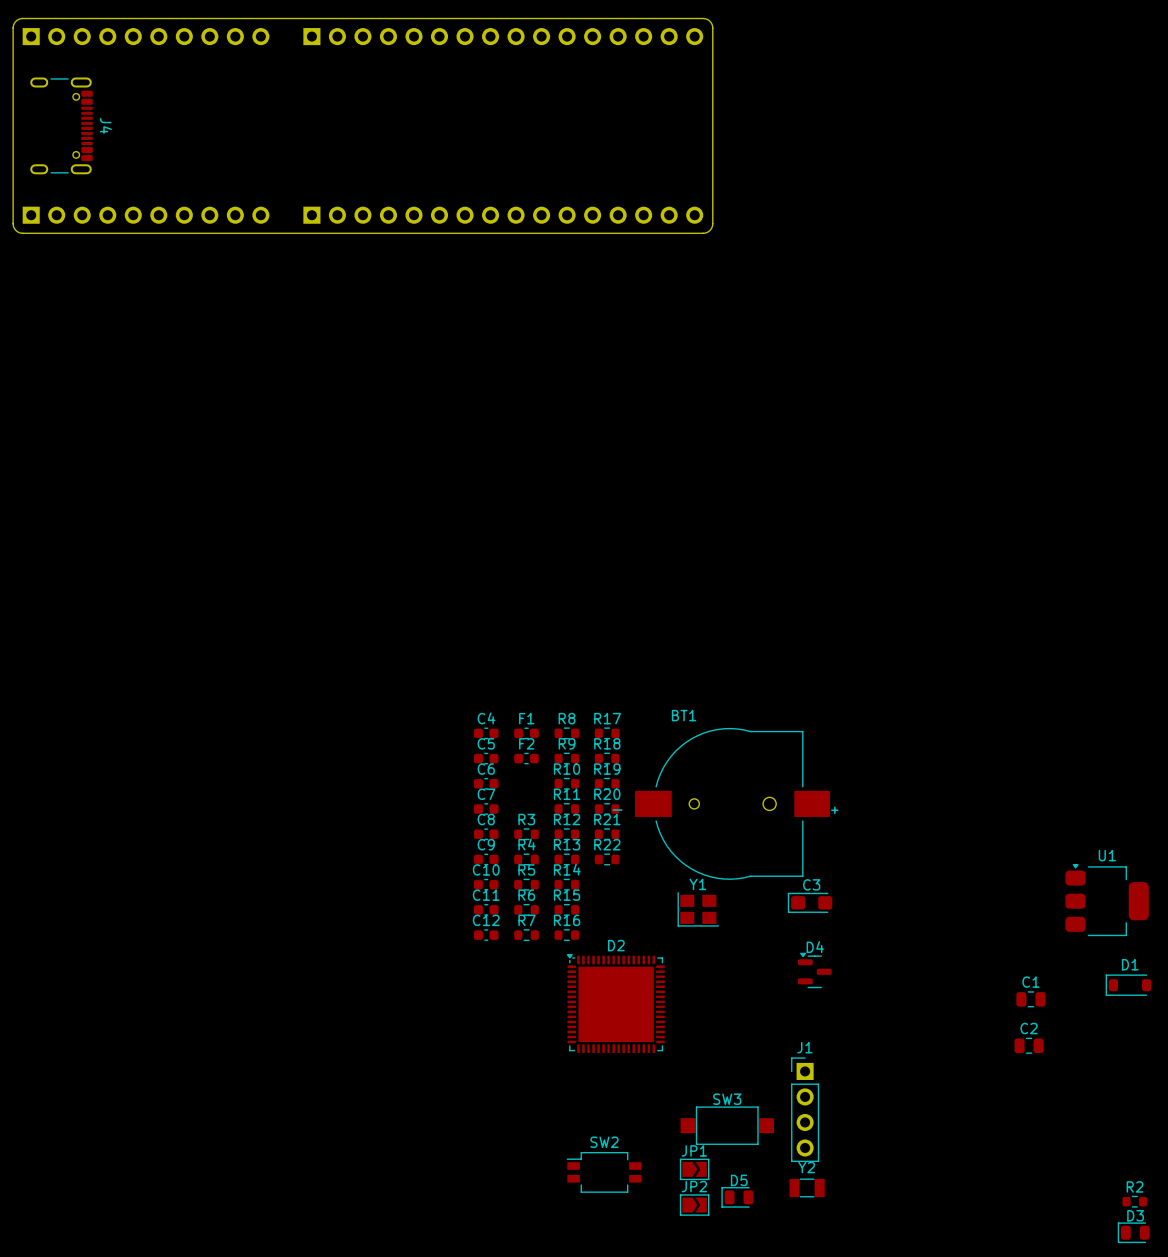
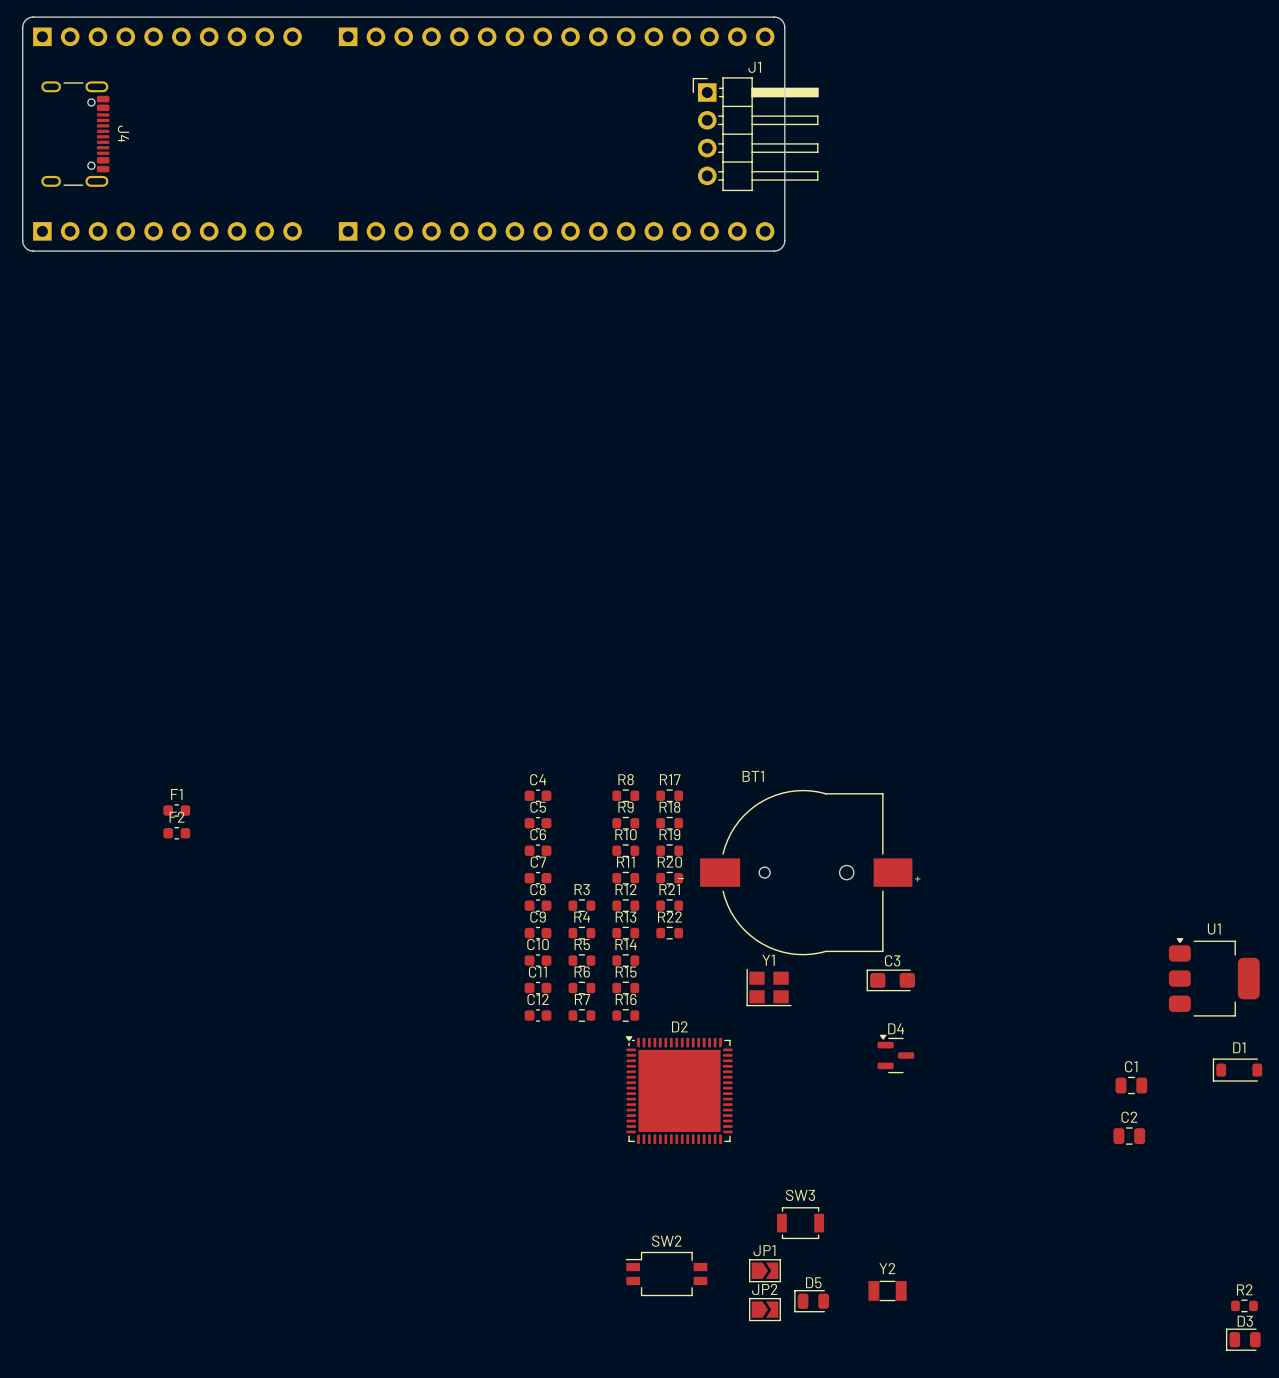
F1 position: (526, 733) -> (176, 810)
F2 position: (526, 758) -> (176, 833)
J1 footprint: [791, 1057, 820, 1162] -> [692, 77, 819, 192]
SW3 footprint: [680, 1106, 774, 1145] -> [777, 1207, 825, 1240]

